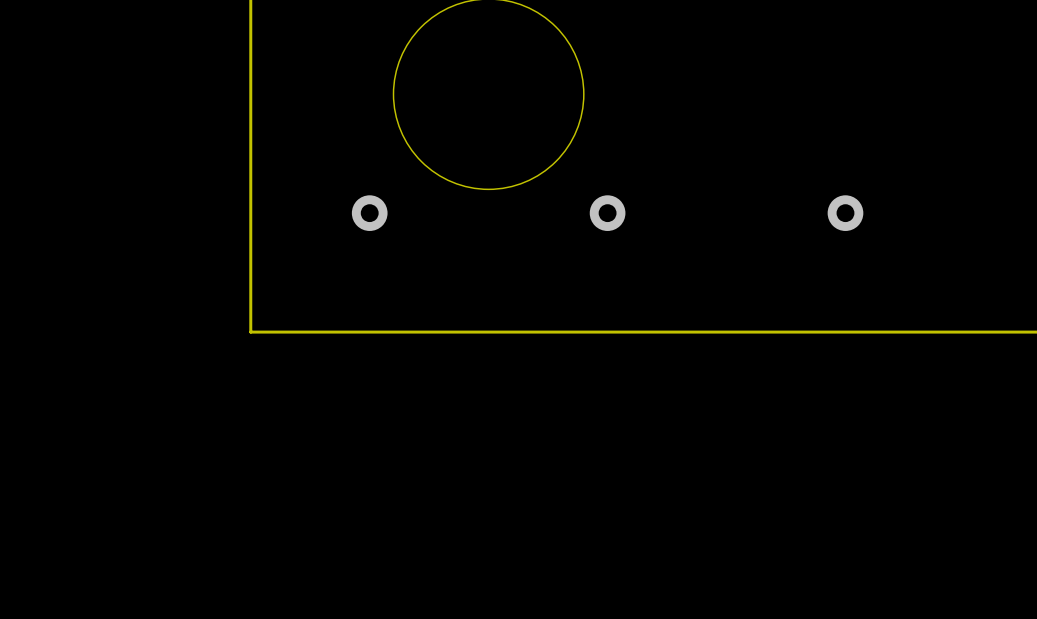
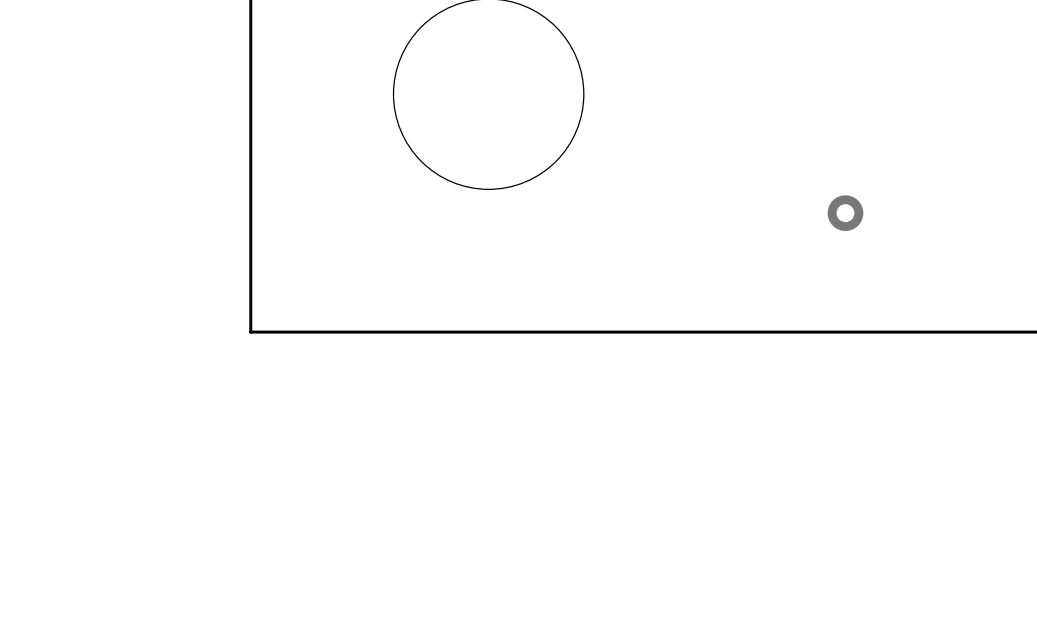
via: (369, 213) -> none
via: (607, 213) -> none

